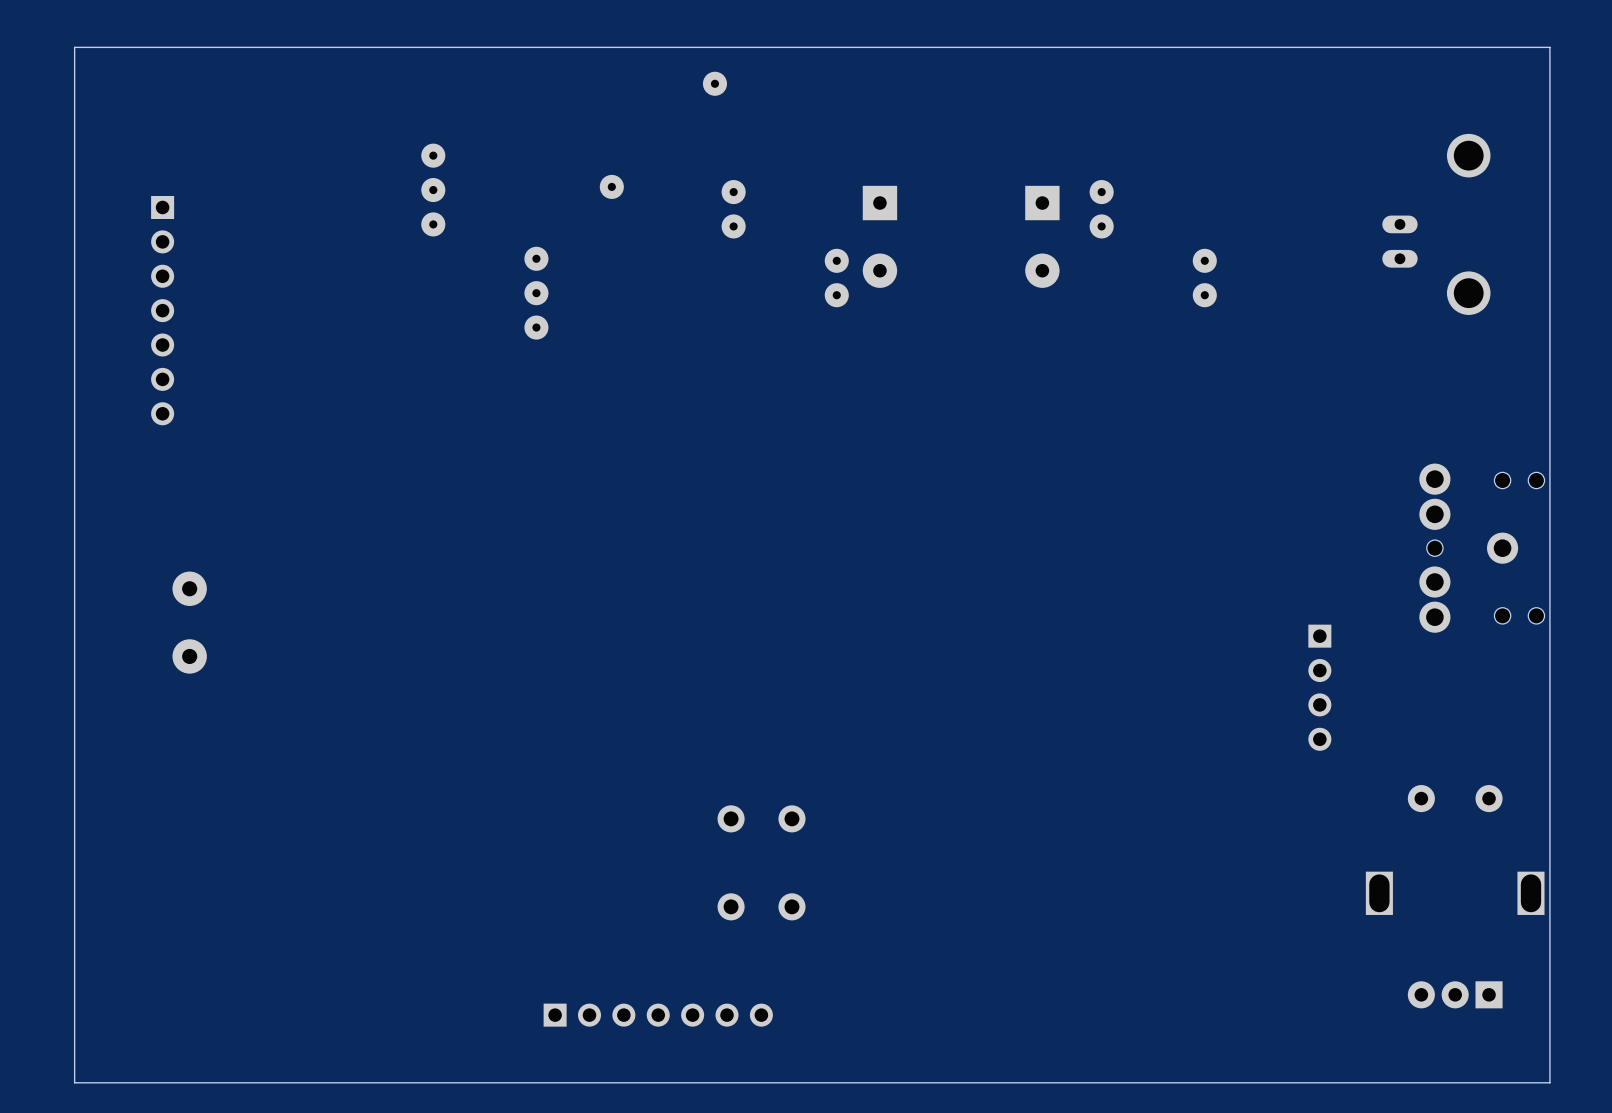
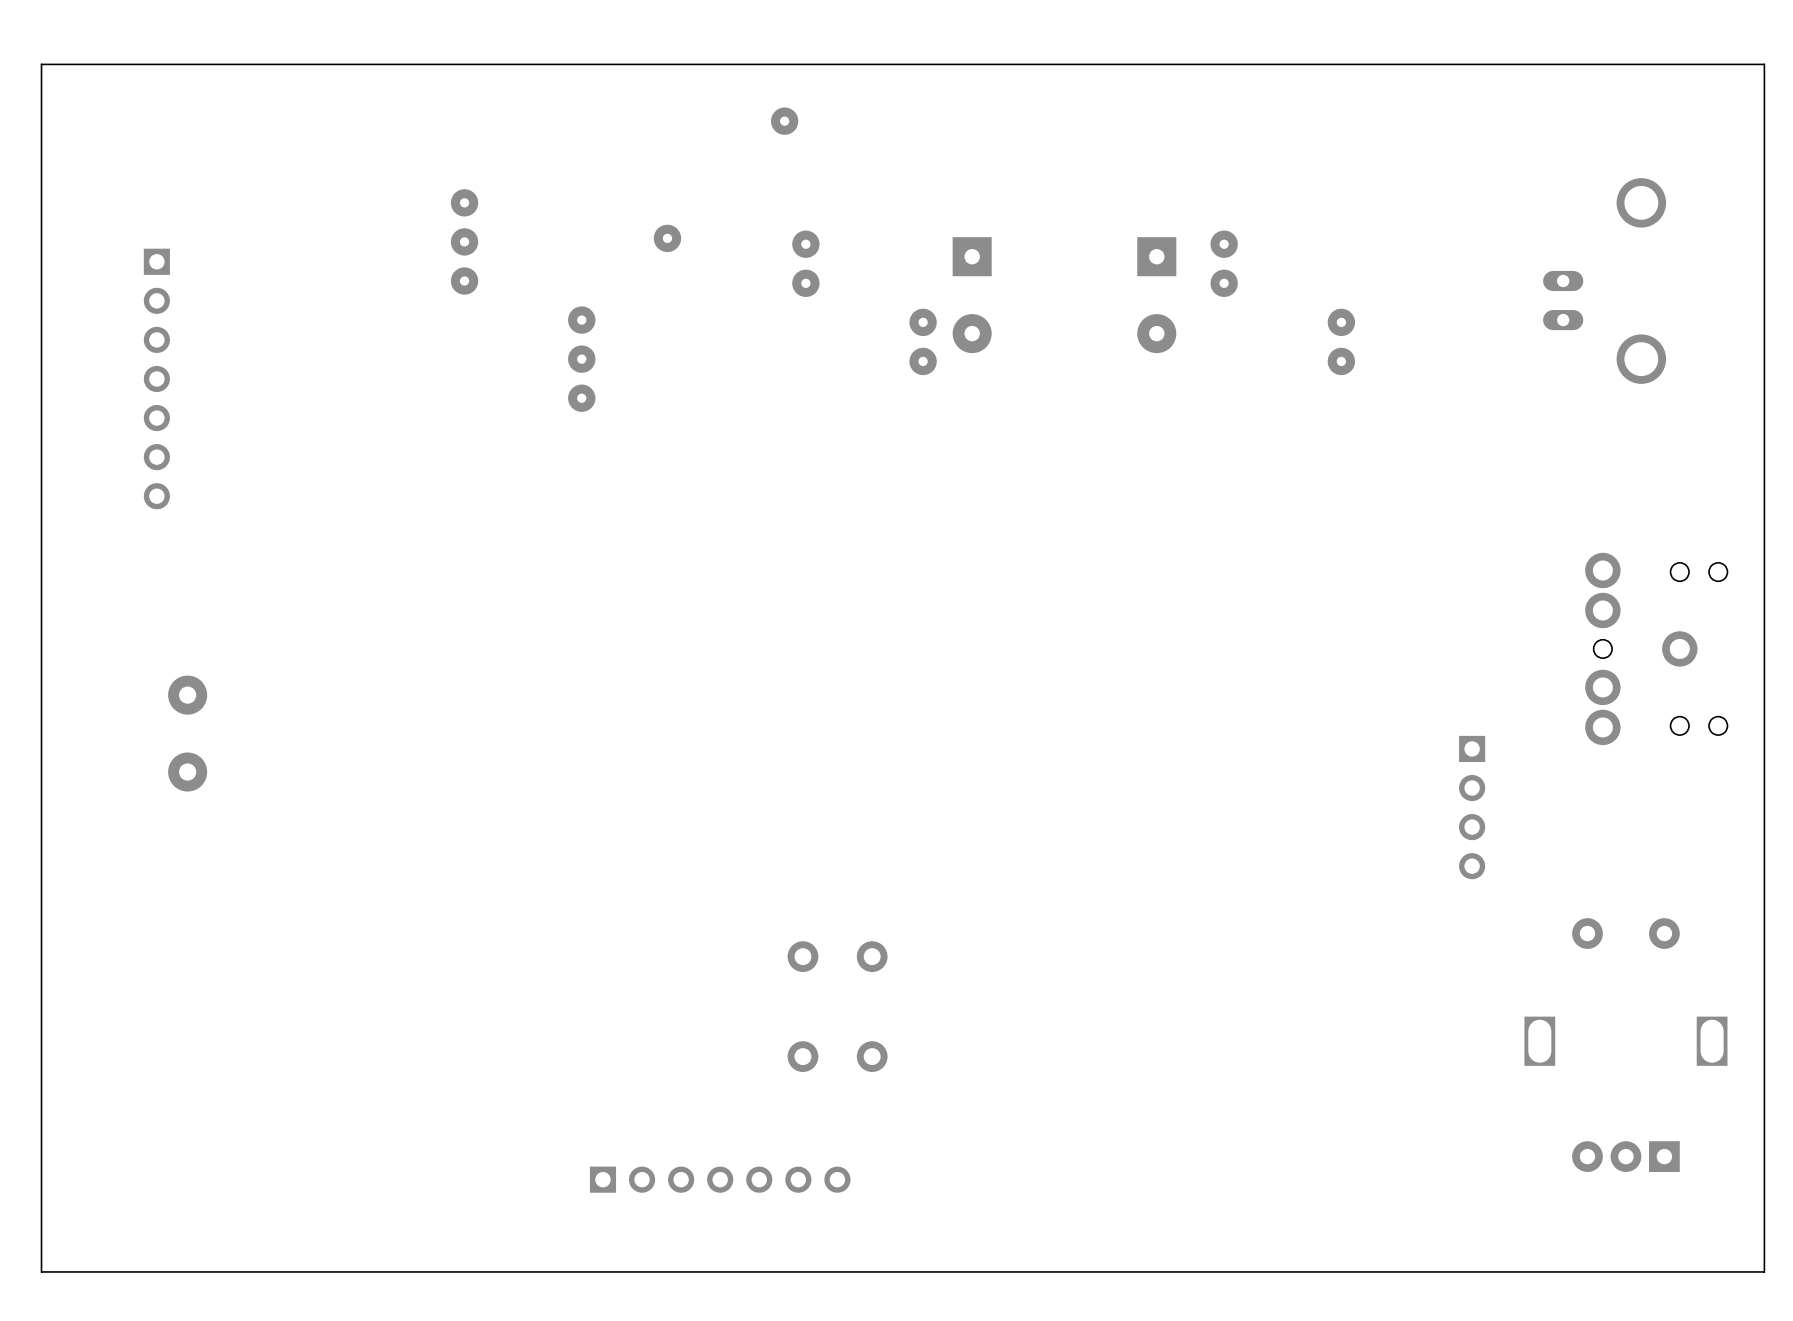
board edge: (1549, 47) (74, 47) (74, 1082) (1549, 1082) (1549, 47) -> (1764, 64) (1764, 1271) (41, 1271) (41, 64) (1764, 64)

